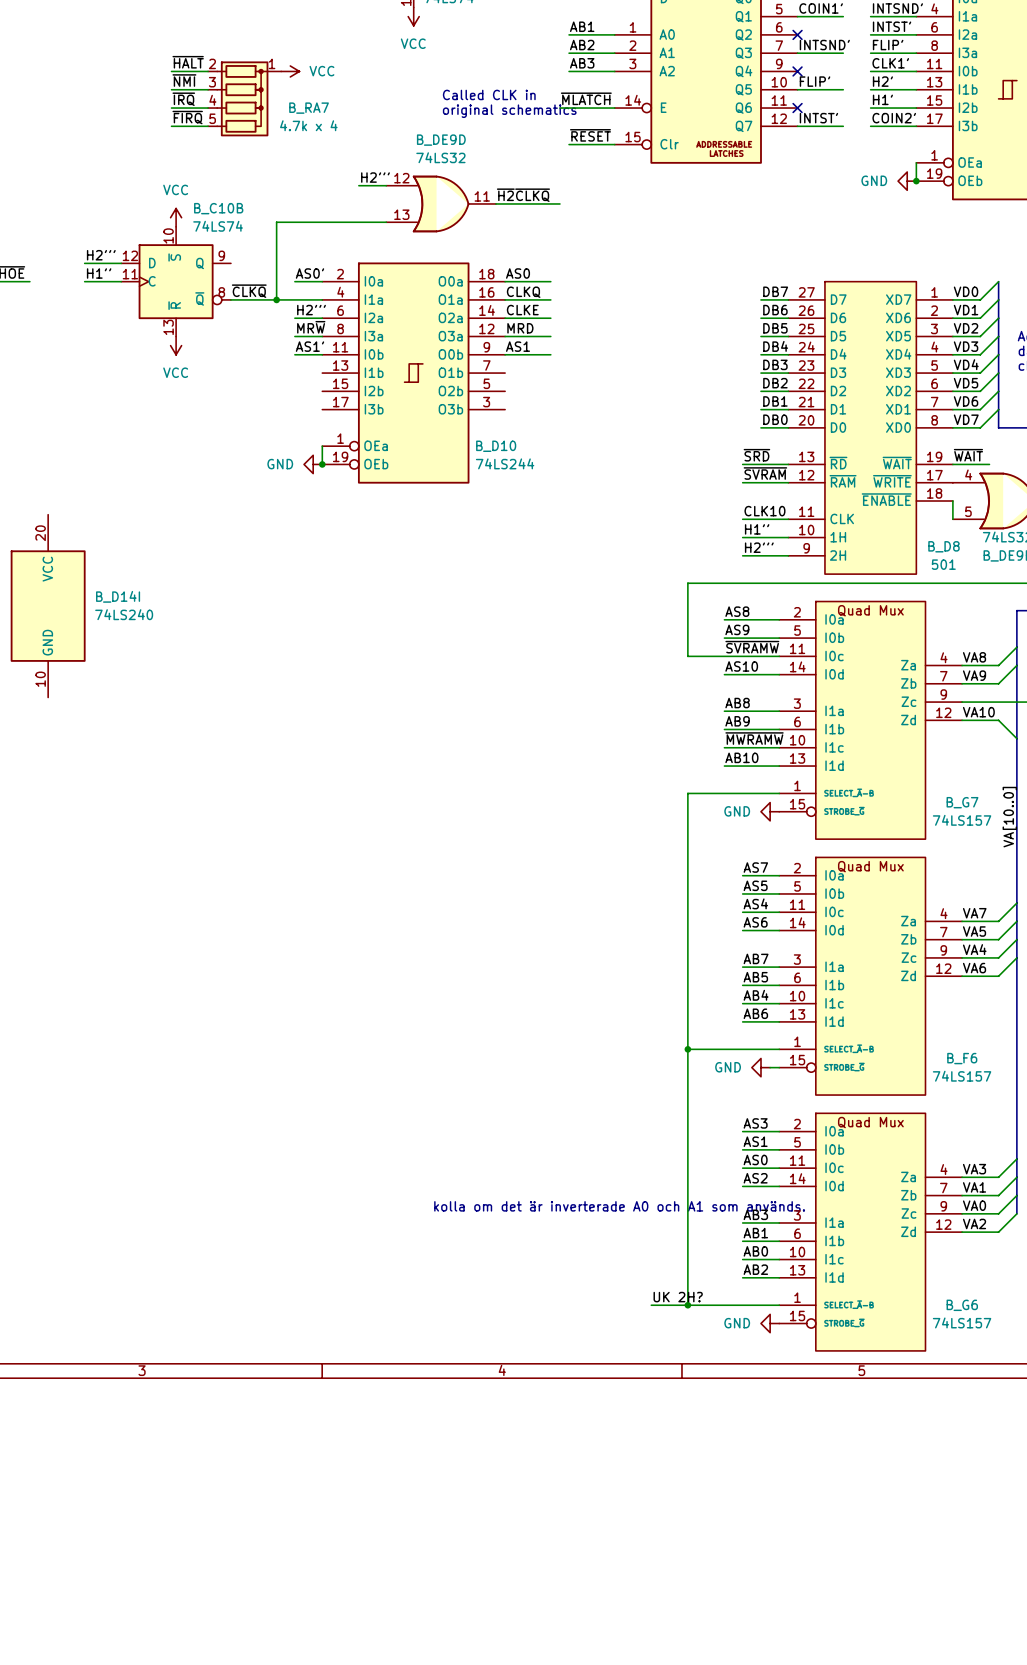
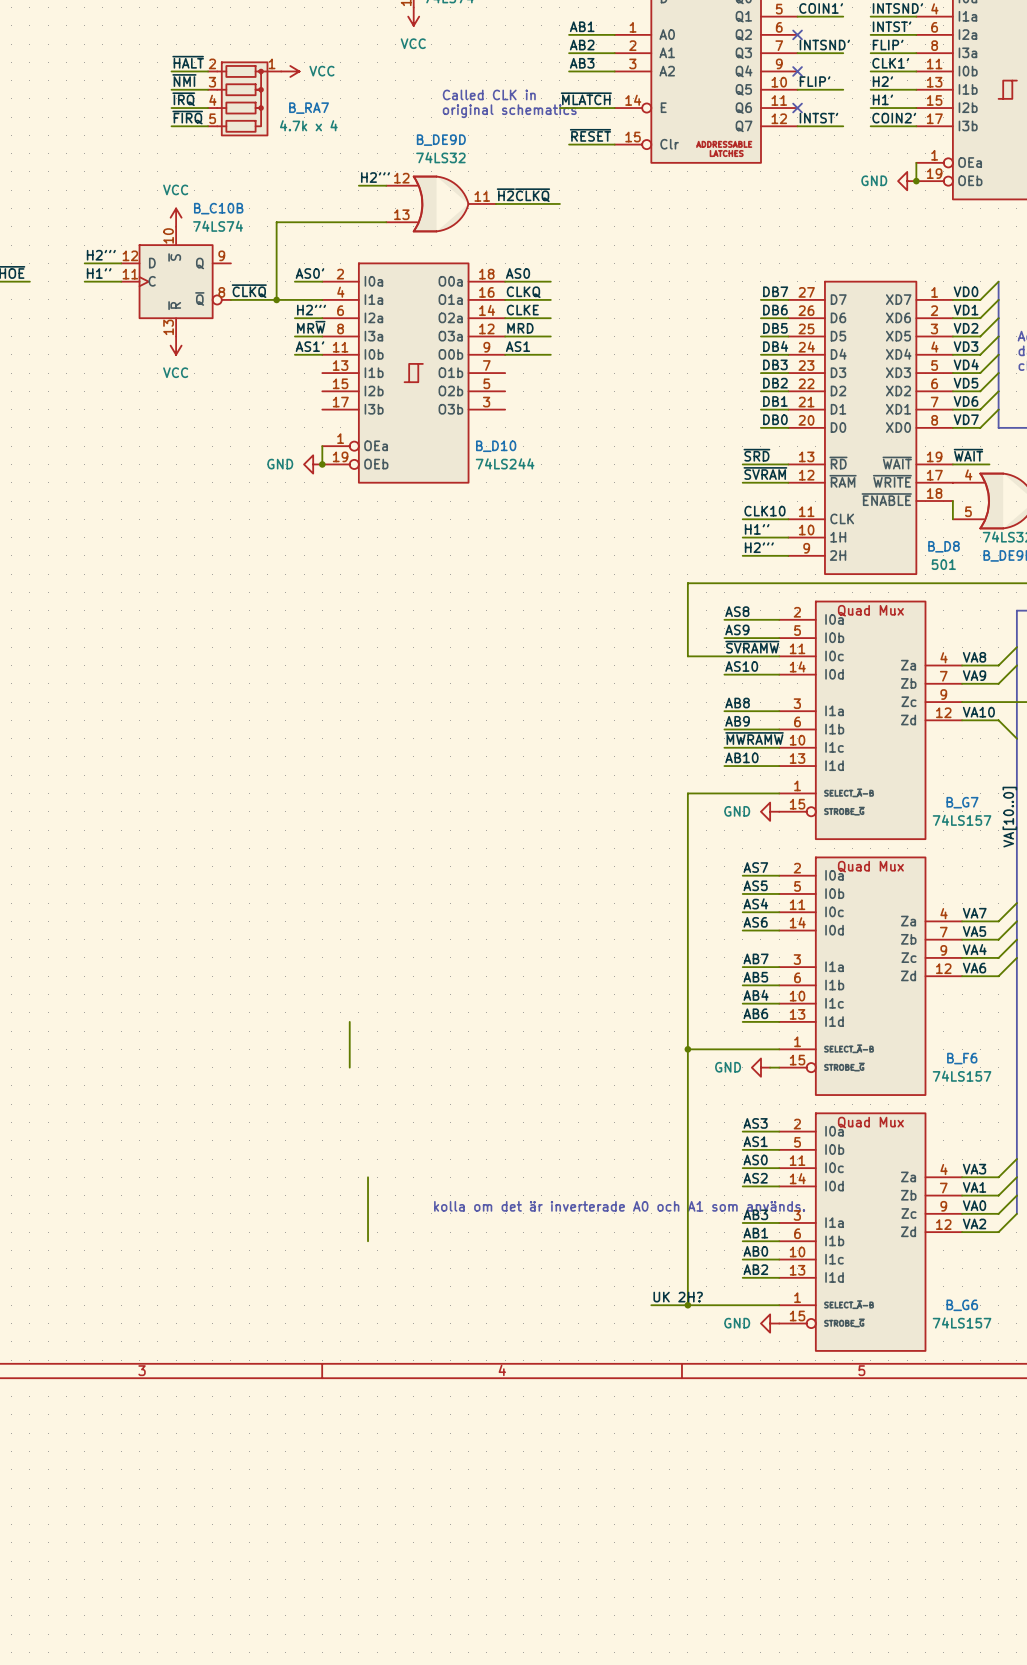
B_D14I: 74LS240 (48, 606) -> none
wire: none -> (349, 1021) (349, 1067)
wire: none -> (368, 1177) (368, 1241)

